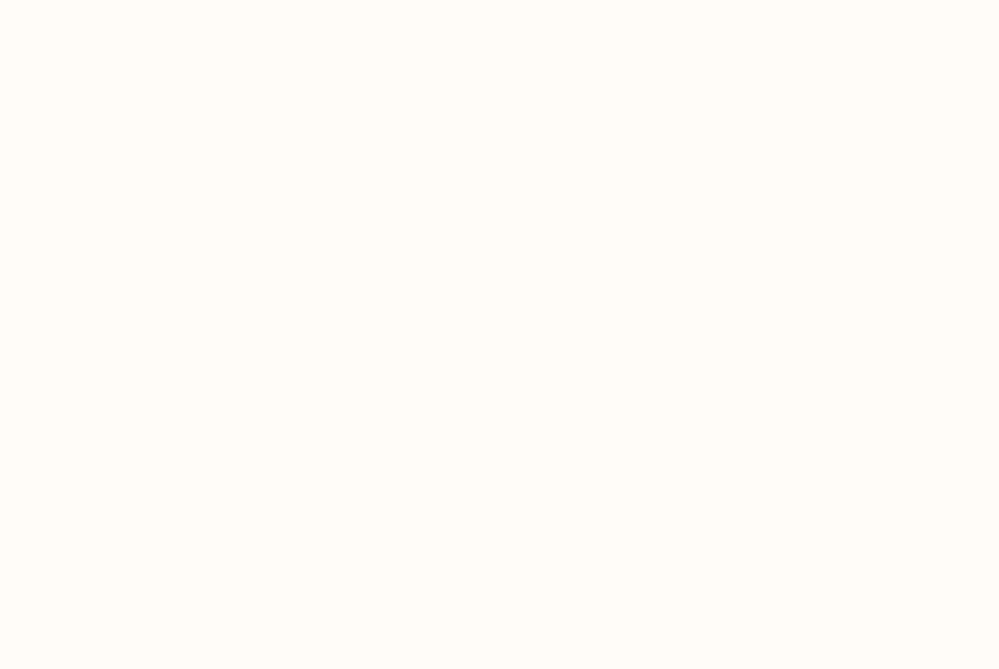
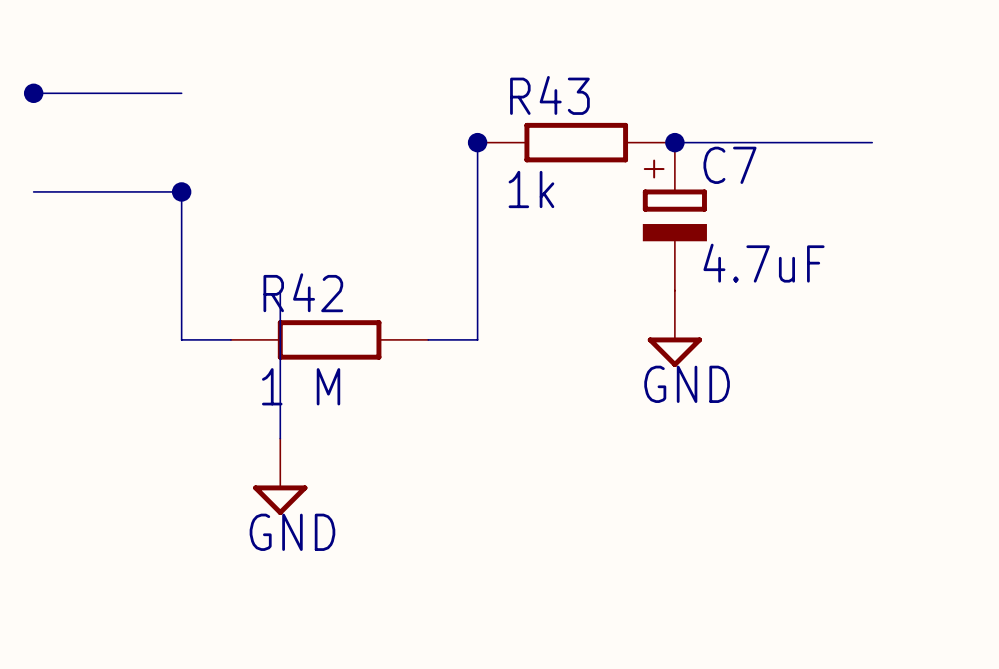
wire: none -> (33, 93) (181, 93)
junction: none -> (33, 93)
wire: none -> (477, 142) (477, 339) (428, 339)
junction: none -> (477, 142)
R43: none -> 1k (576, 142)
wire: none -> (674, 142) (872, 142)
junction: none -> (674, 142)
wire: none -> (33, 191) (181, 191) (181, 339) (230, 339)
junction: none -> (181, 191)
C7: none -> 4.7uF (674, 216)
wire: none -> (280, 290) (280, 438)
power symbol: none -> GND (674, 328)
R42: none -> 1 M (329, 339)
power symbol: none -> GND (280, 476)

